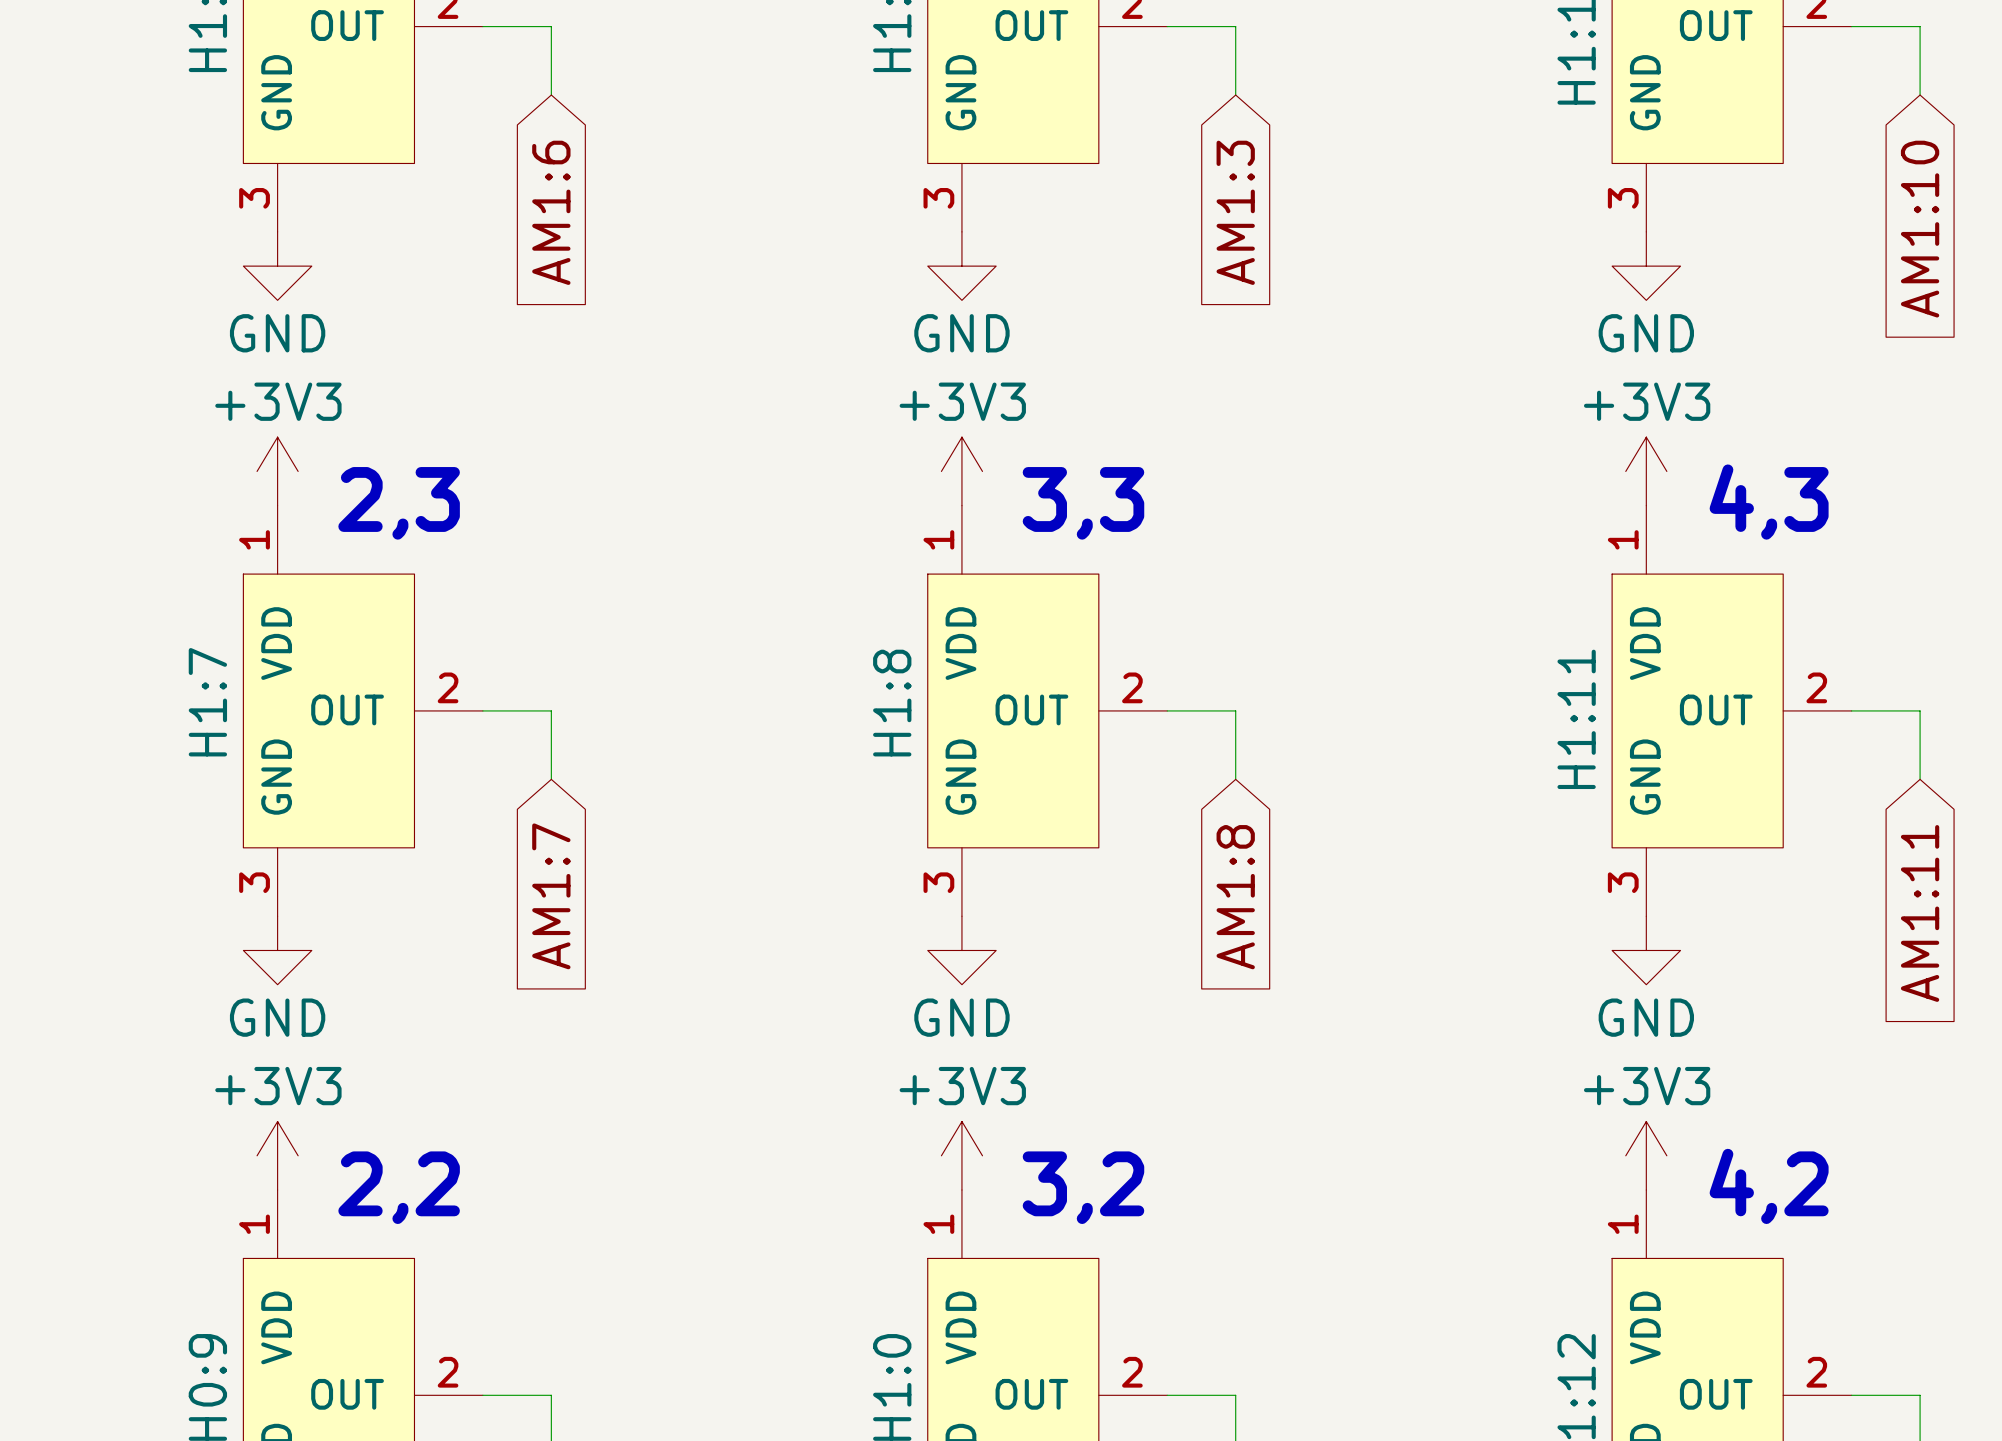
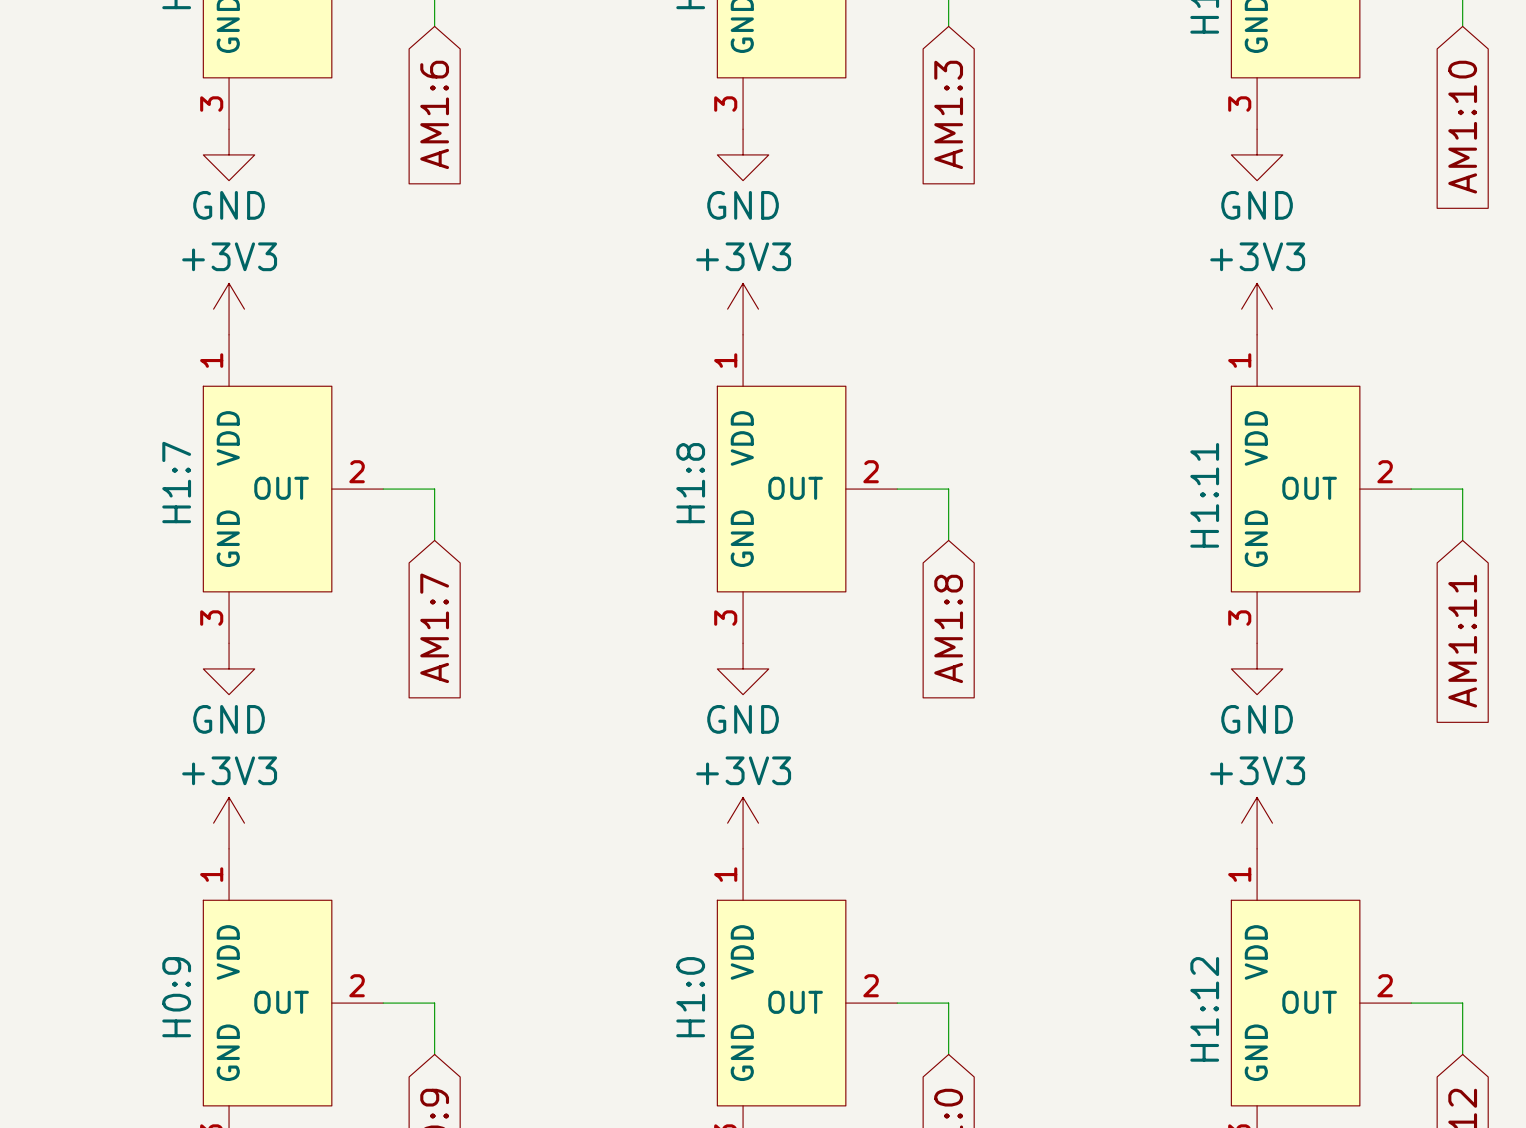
text: 4,3 (1769, 502) -> none
text: 2,3 (399, 503) -> none
text: 3,3 (1083, 503) -> none
text: 4,2 (1769, 1186) -> none
text: 2,2 (399, 1187) -> none
text: 3,2 (1083, 1187) -> none

